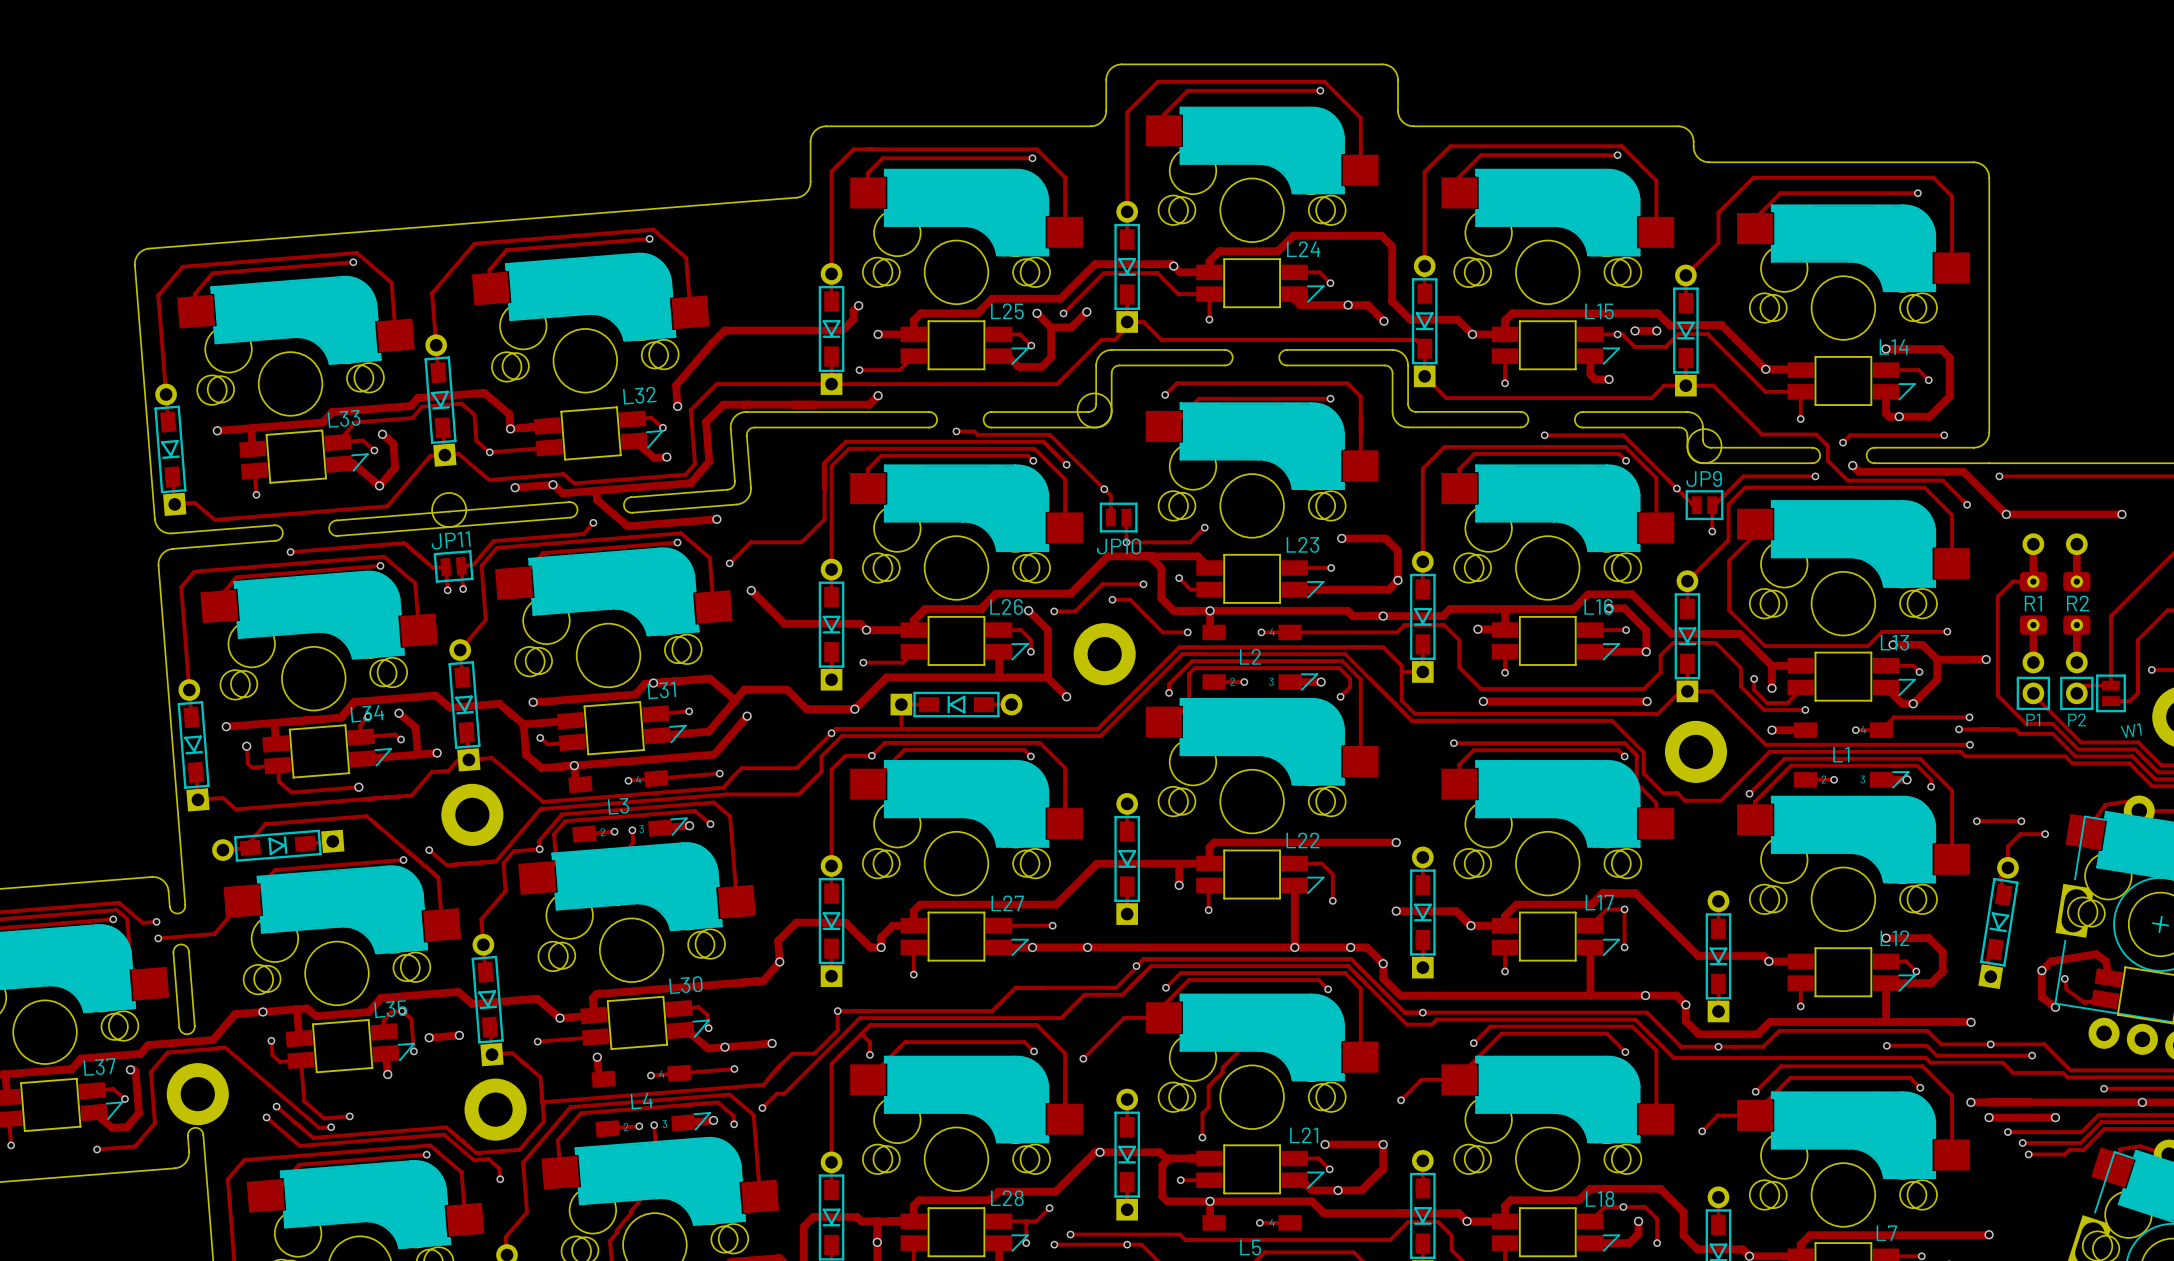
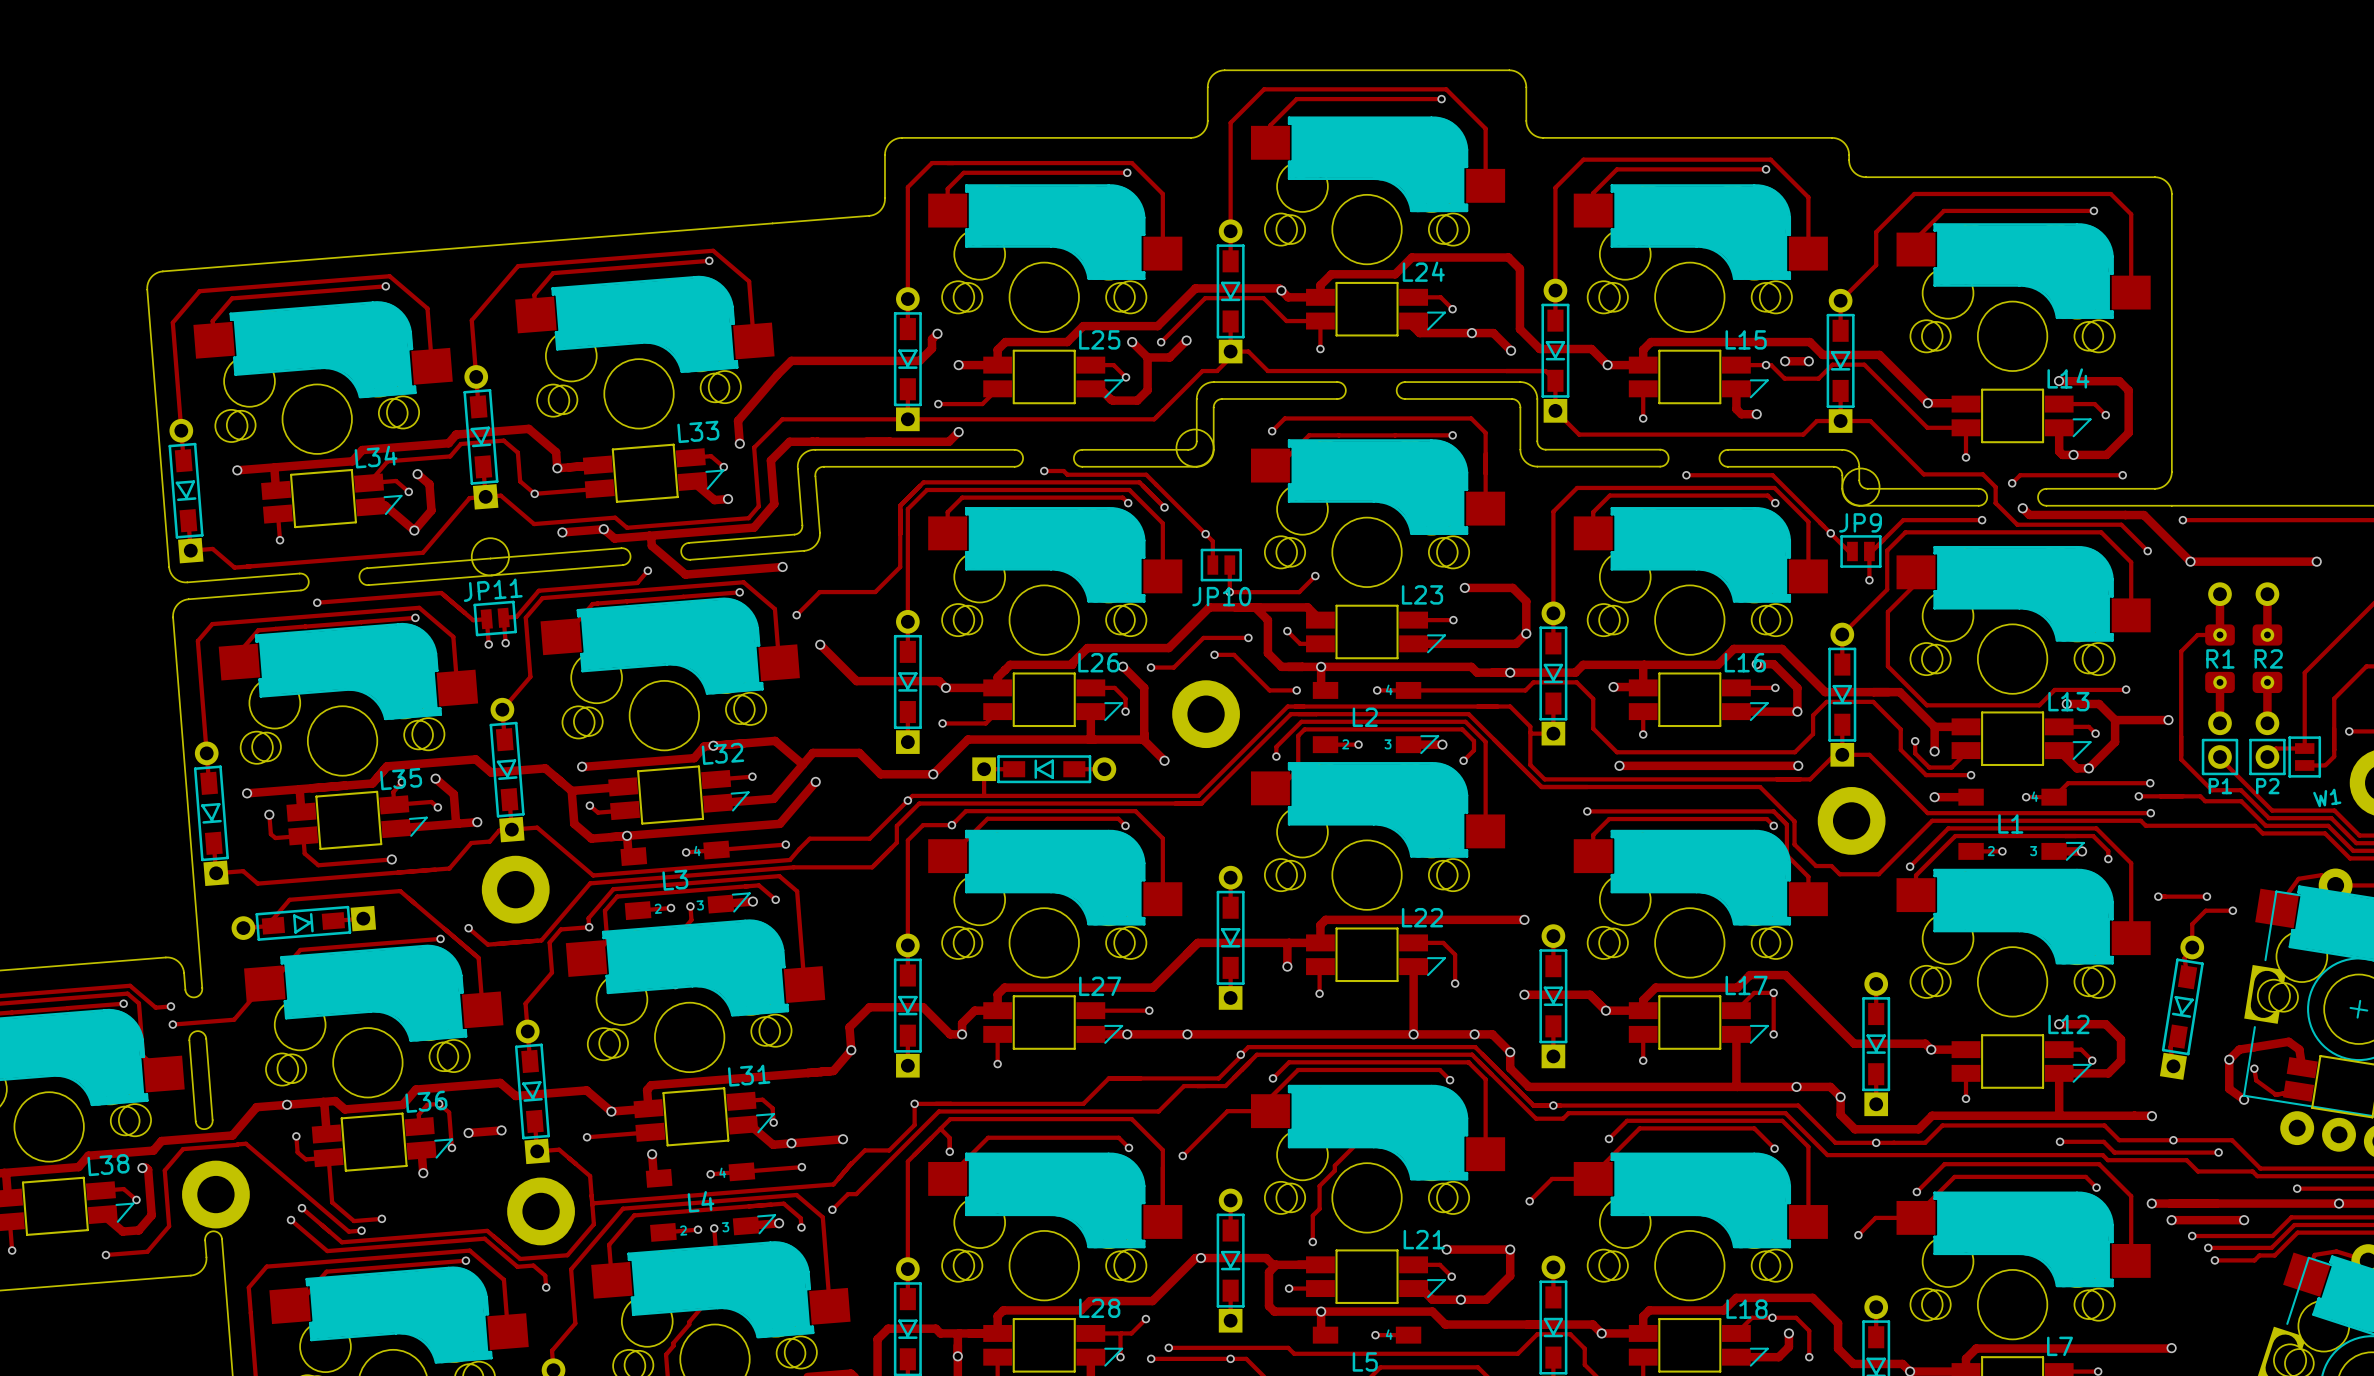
L32 name: L32 (639, 395) -> L33 (698, 431)
L33 name: L33 (344, 418) -> L34 (376, 457)
L31 name: L31 (661, 690) -> L32 (722, 753)
L34 name: L34 (367, 713) -> L35 (401, 779)
L30 name: L30 (685, 985) -> L31 (749, 1075)
L35 name: L35 (390, 1009) -> L36 (426, 1101)
L37 name: L37 (99, 1066) -> L38 (108, 1165)

